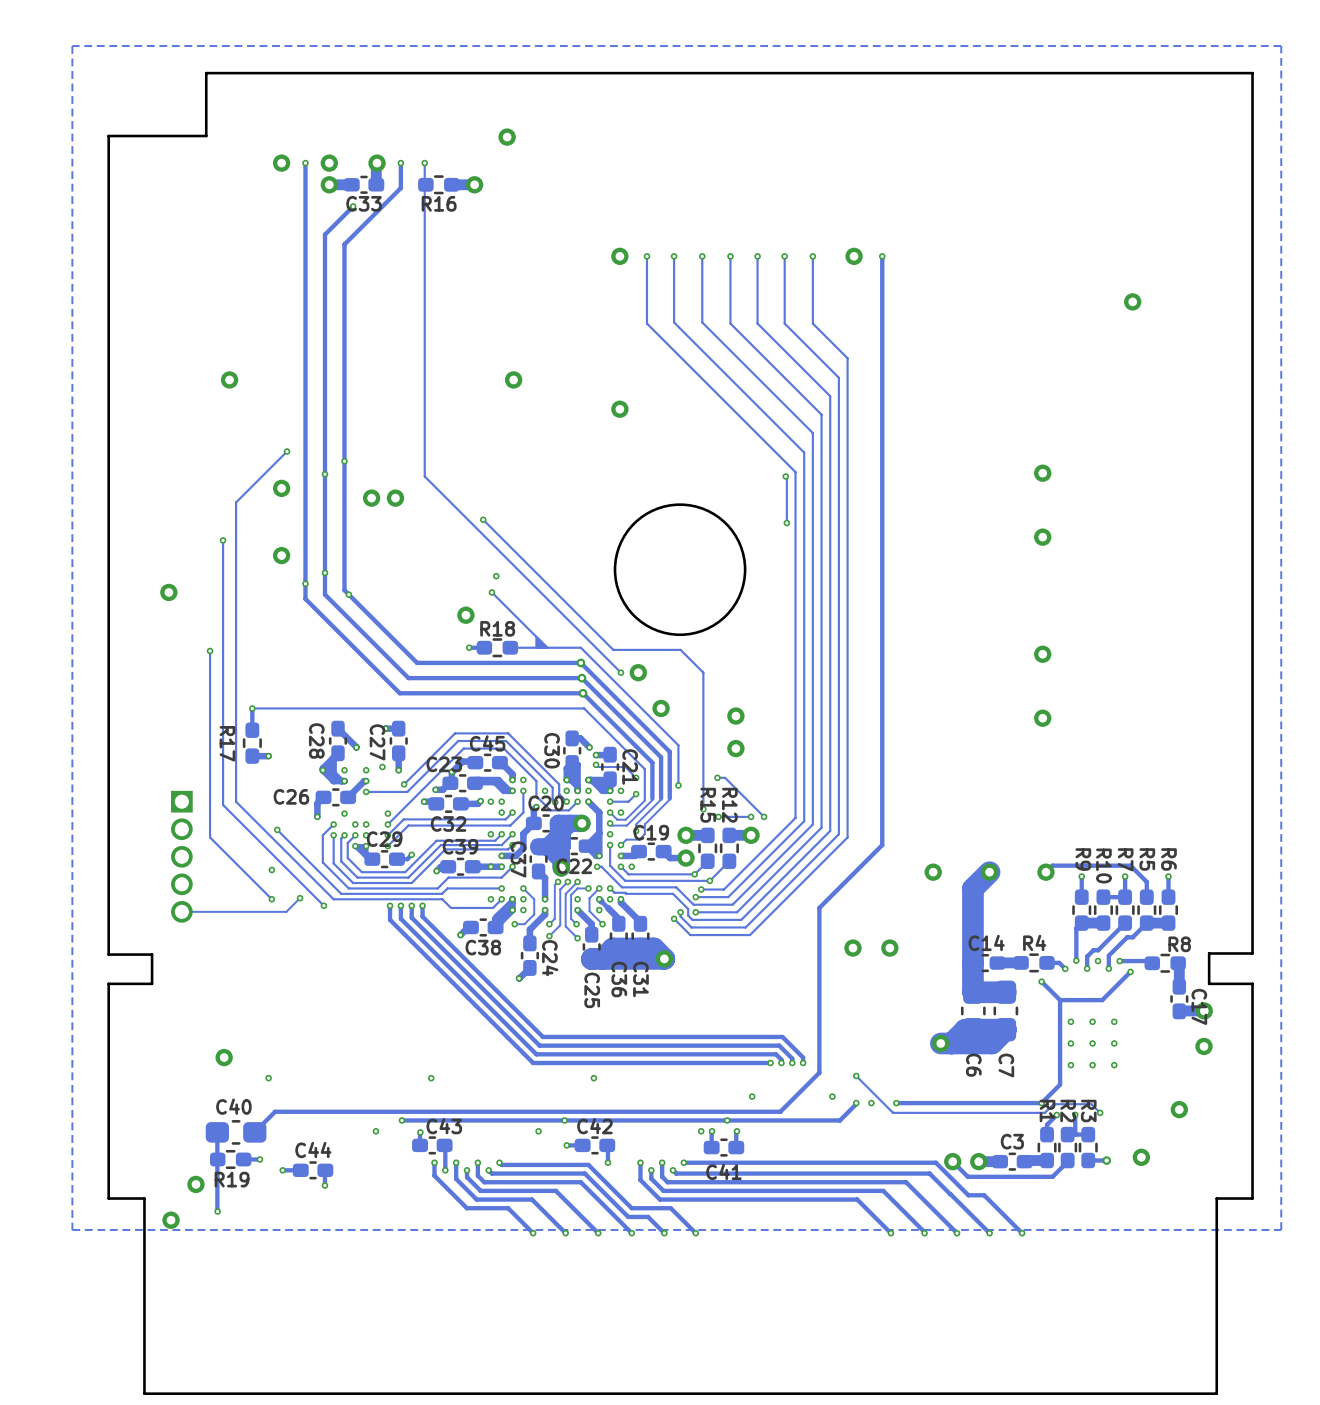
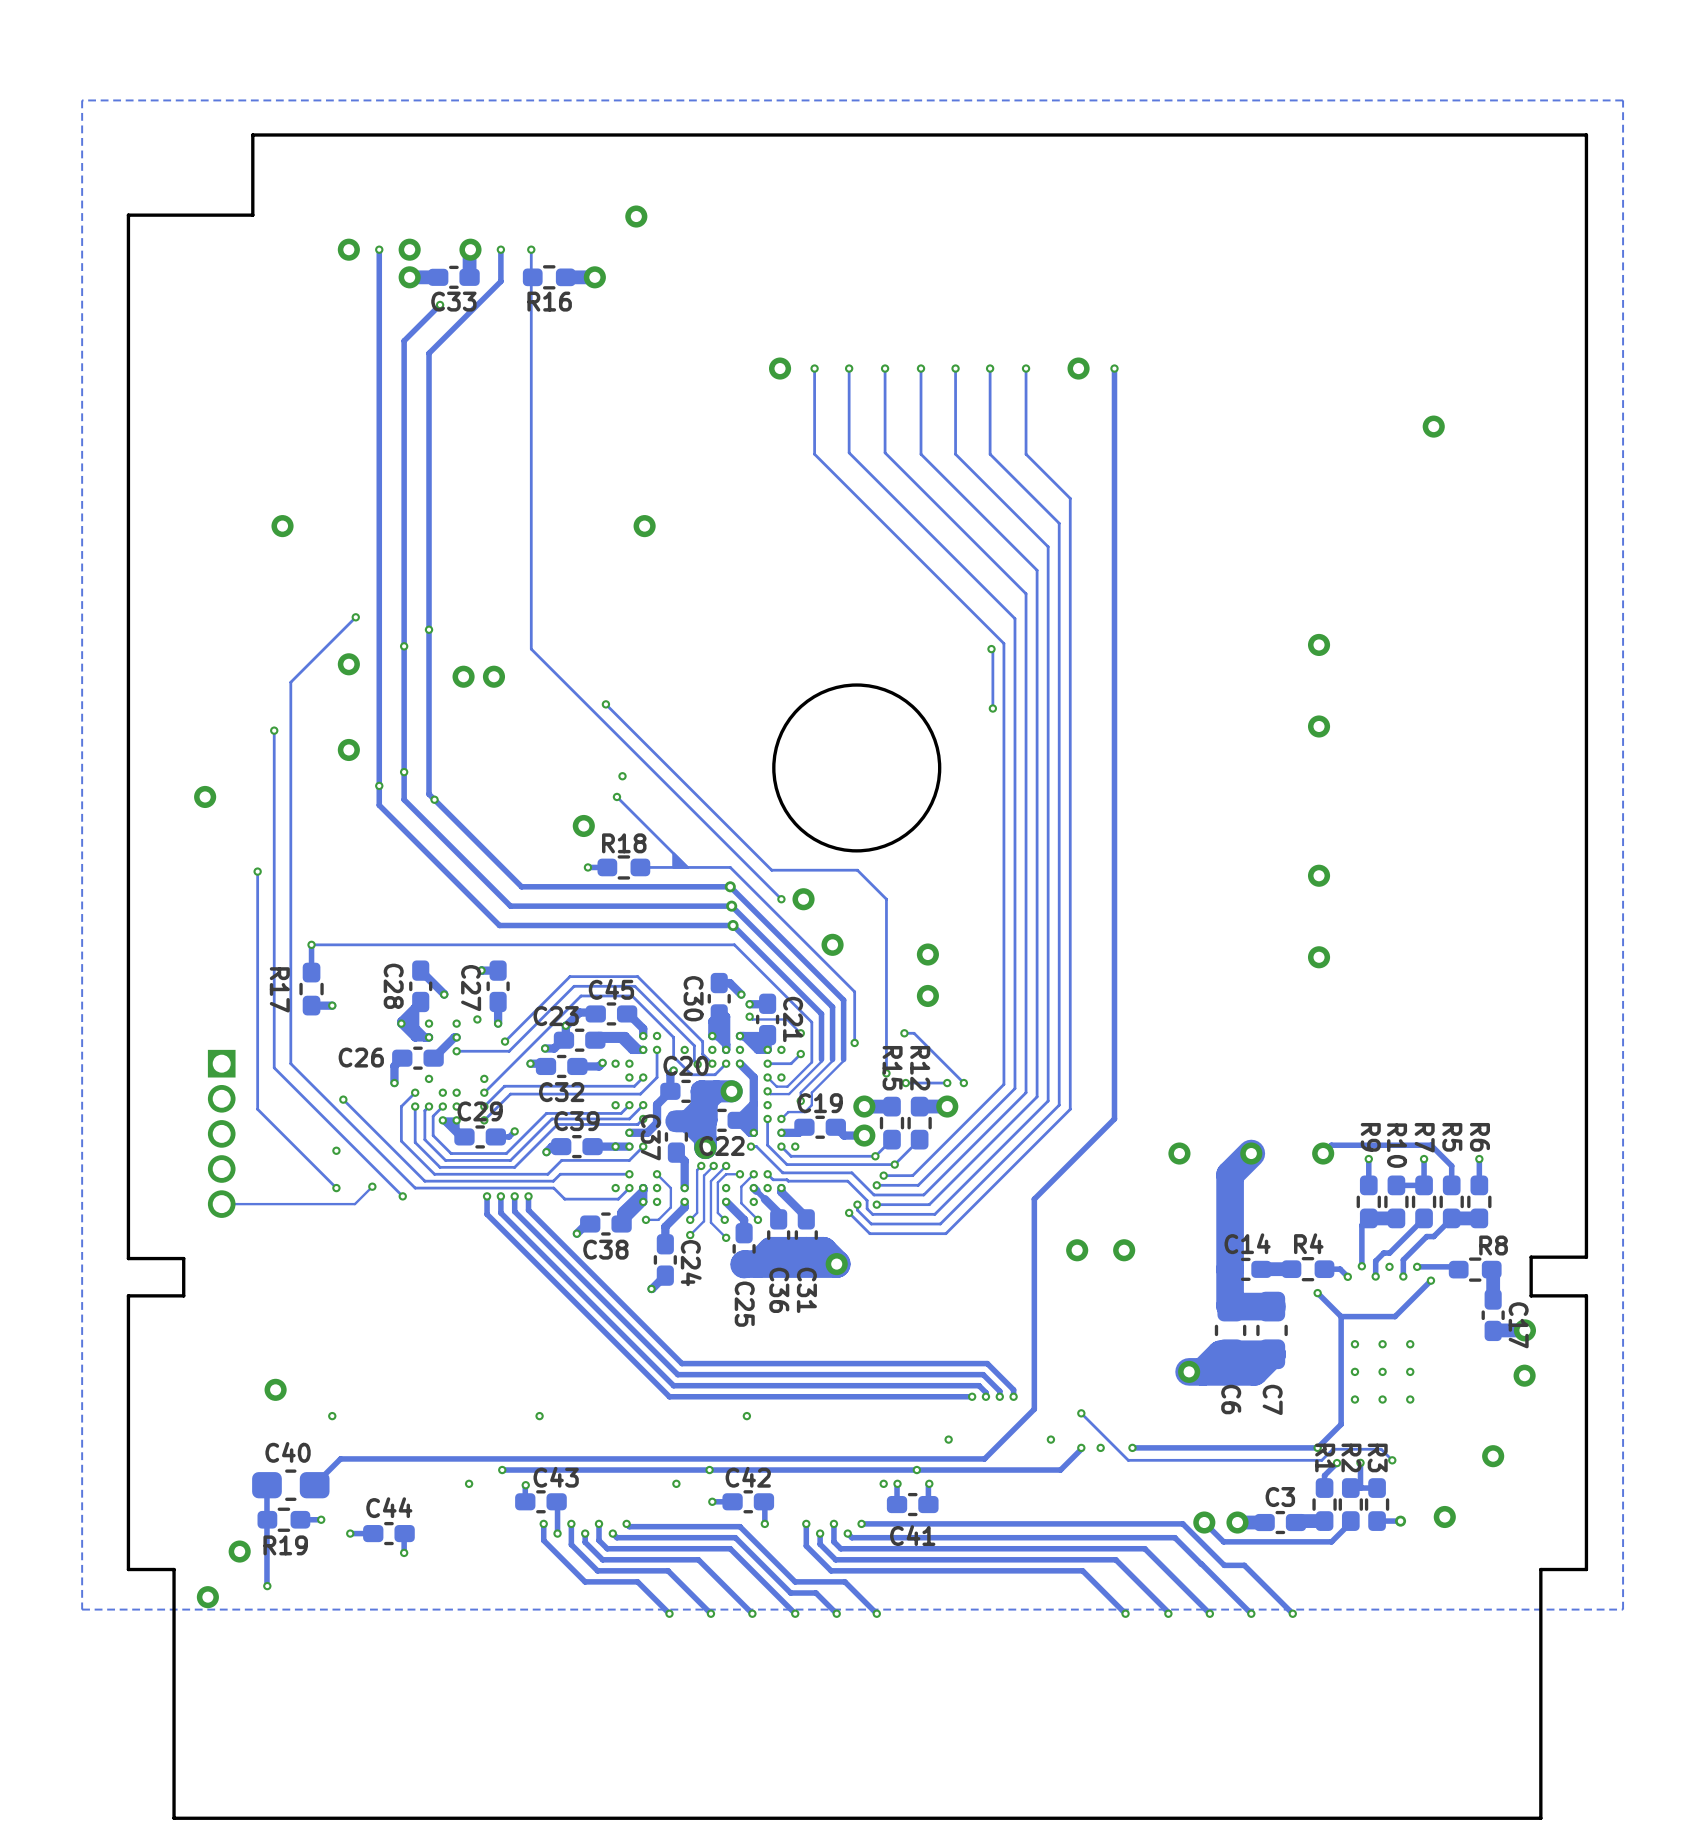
via: (619, 409) -> none

